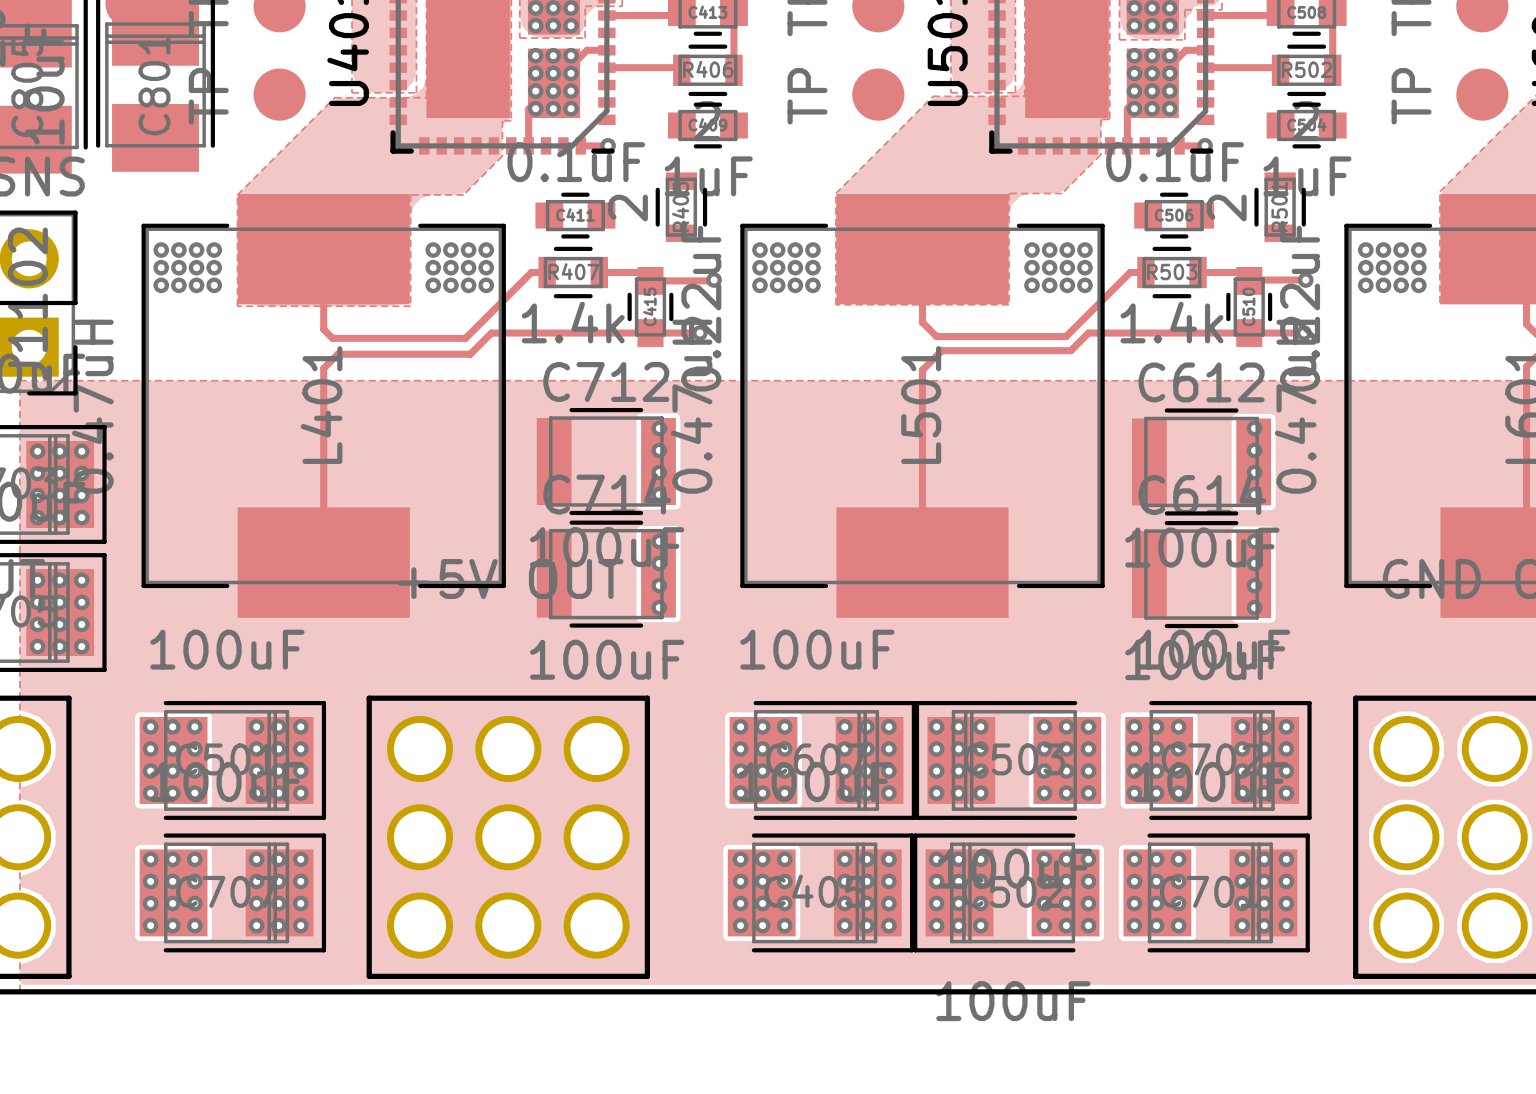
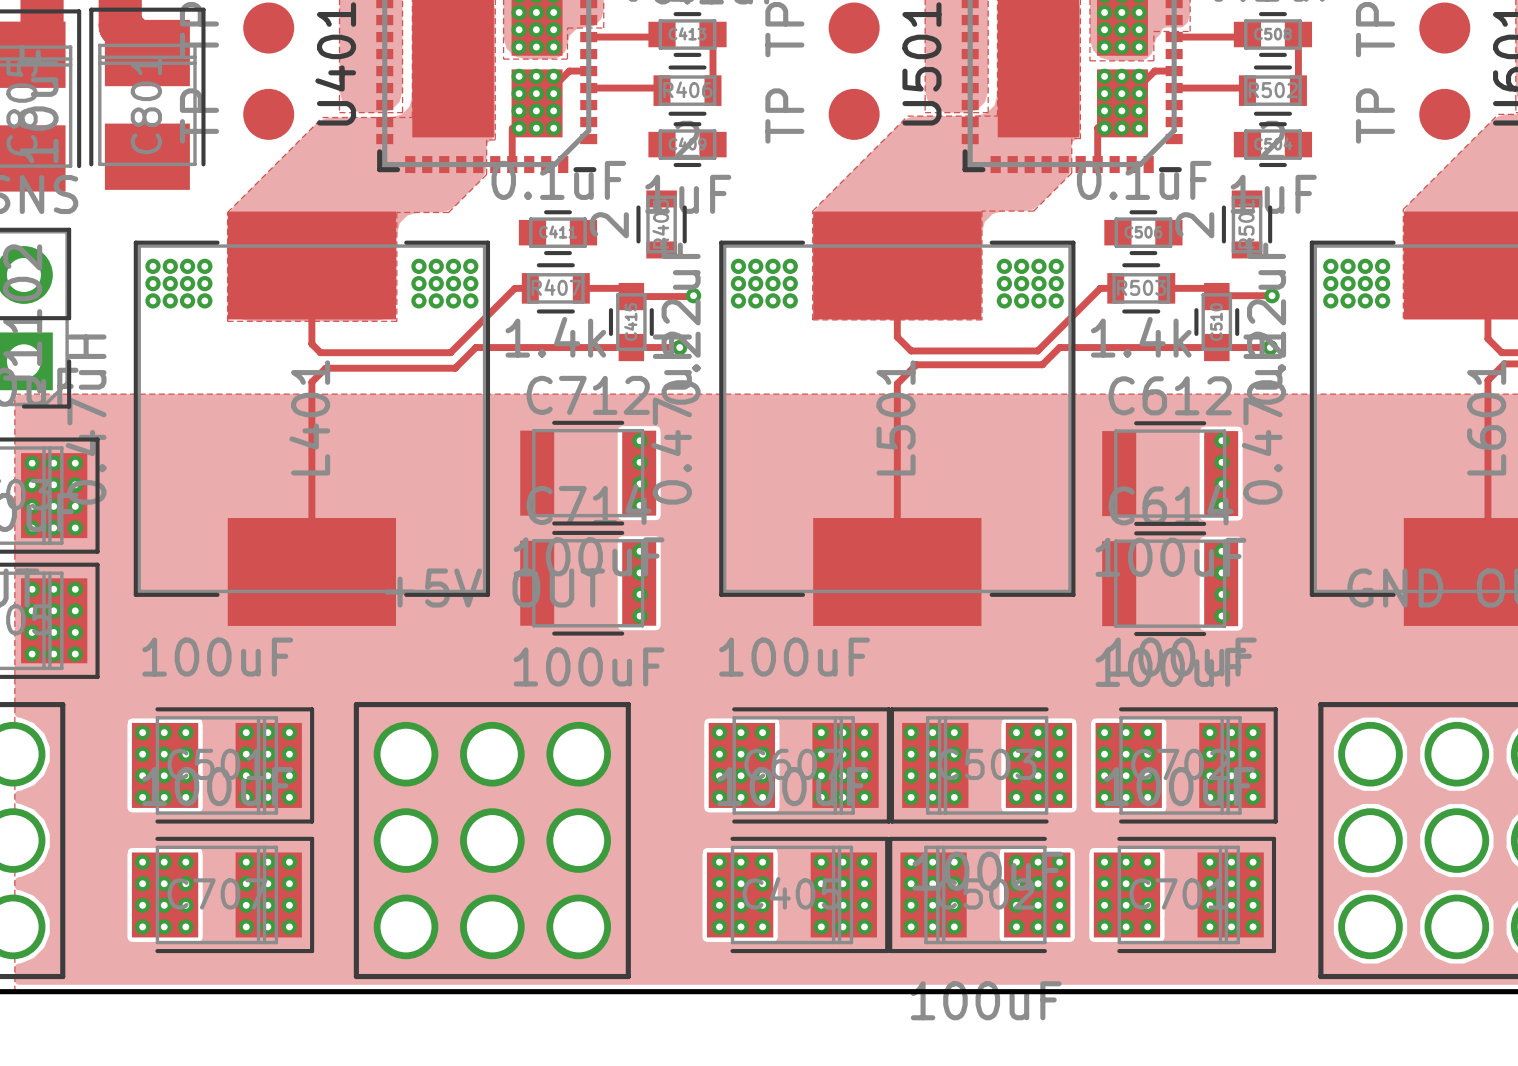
track: (580, 145) (608, 145) -> none
via: (608, 145) -> none
track: (1179, 145) (1204, 145) -> none
via: (1205, 145) -> none

